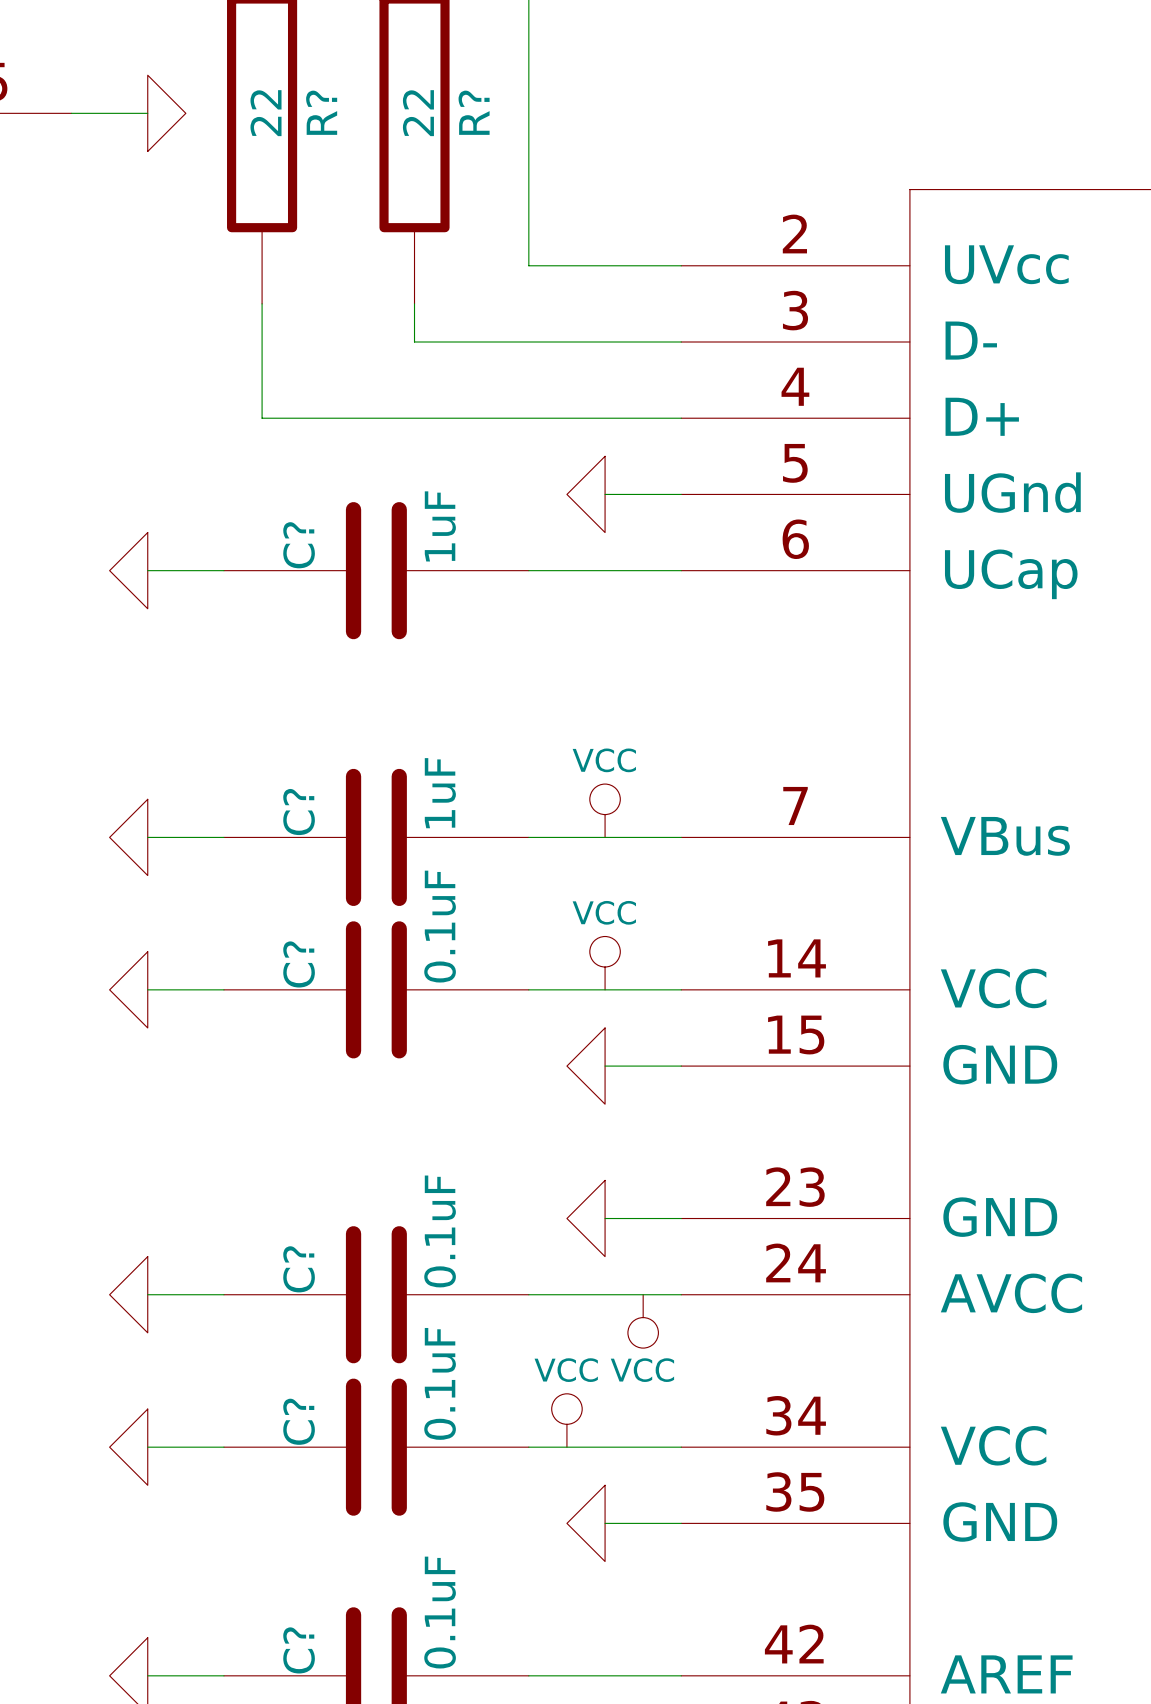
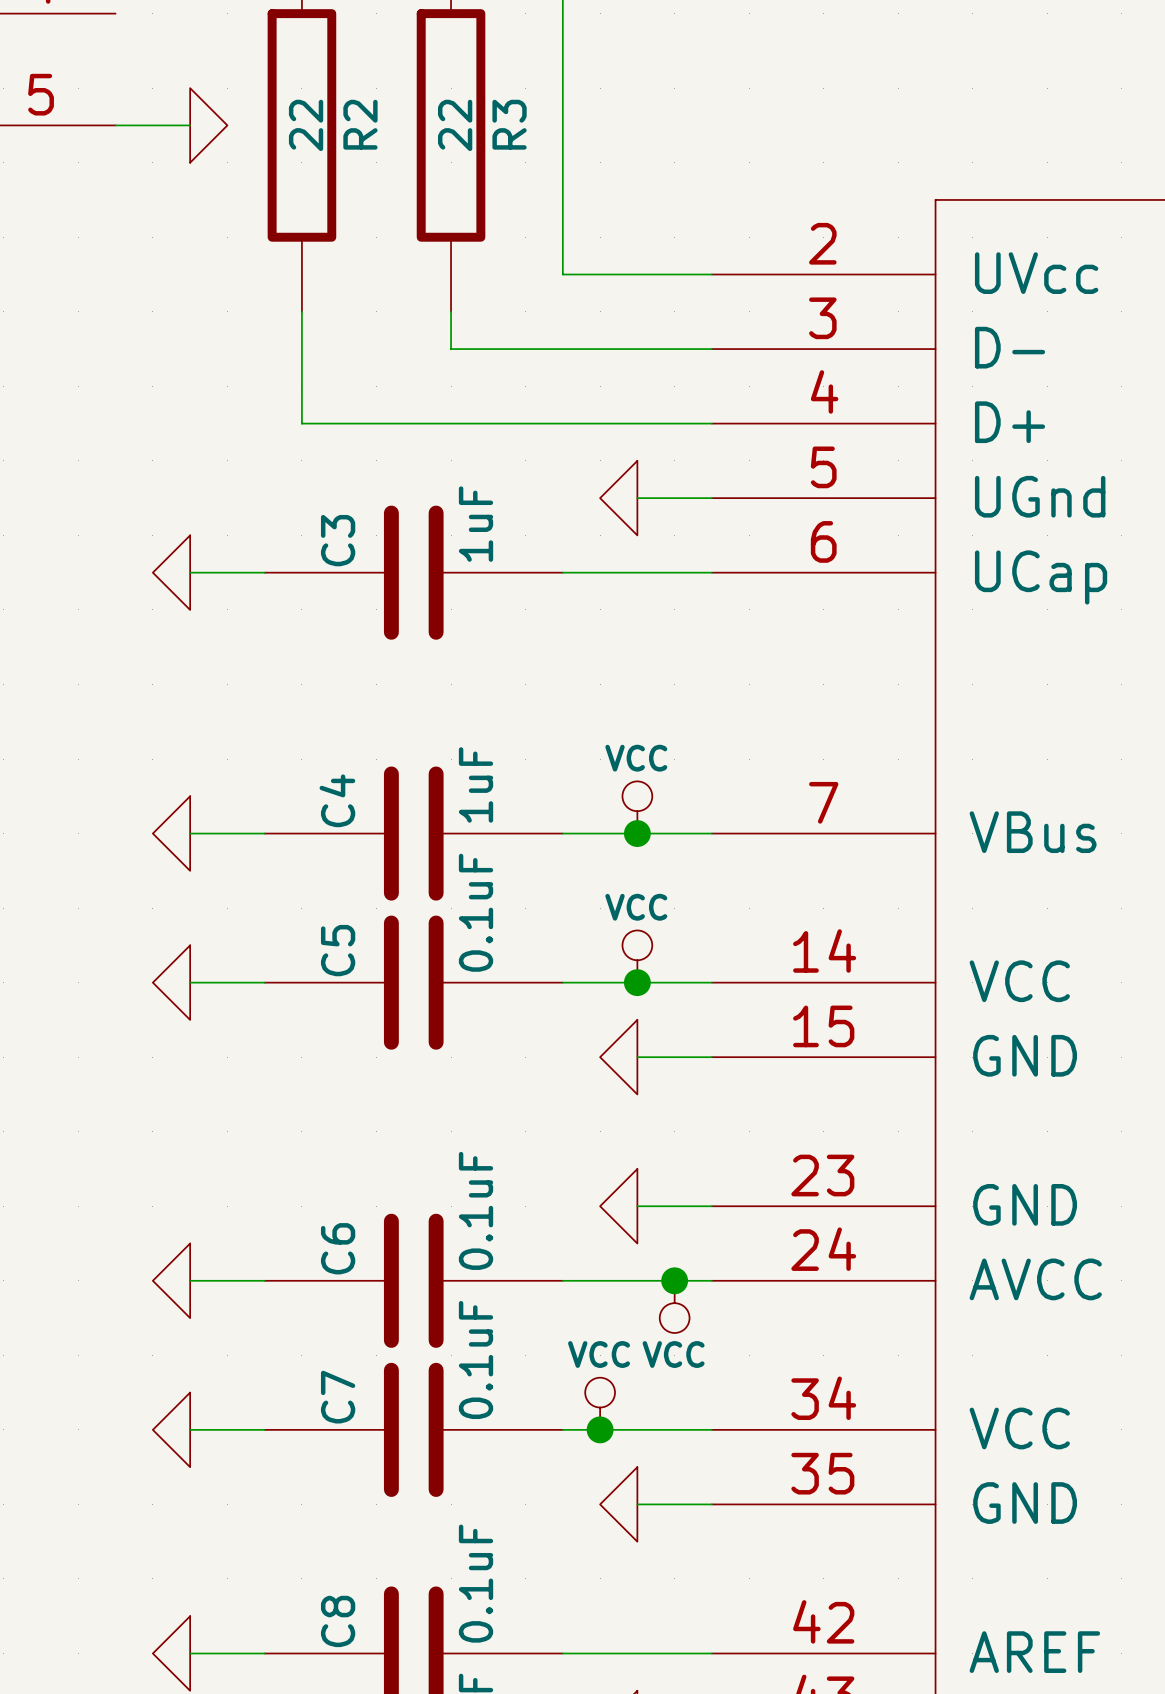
R? name: R? (321, 112) -> R2 (360, 124)
R? name: R? (474, 112) -> R3 (509, 124)
C? name: C? (299, 545) -> C3 (338, 540)
C? name: C? (299, 812) -> C4 (337, 800)
junction: none -> (637, 833)
C? name: C? (299, 964) -> C5 (338, 950)
junction: none -> (637, 982)
C? name: C? (299, 1269) -> C6 (338, 1248)
junction: none -> (674, 1280)
C? name: C? (299, 1421) -> C7 (338, 1397)
junction: none -> (600, 1429)
C? name: C? (299, 1650) -> C8 (338, 1621)

